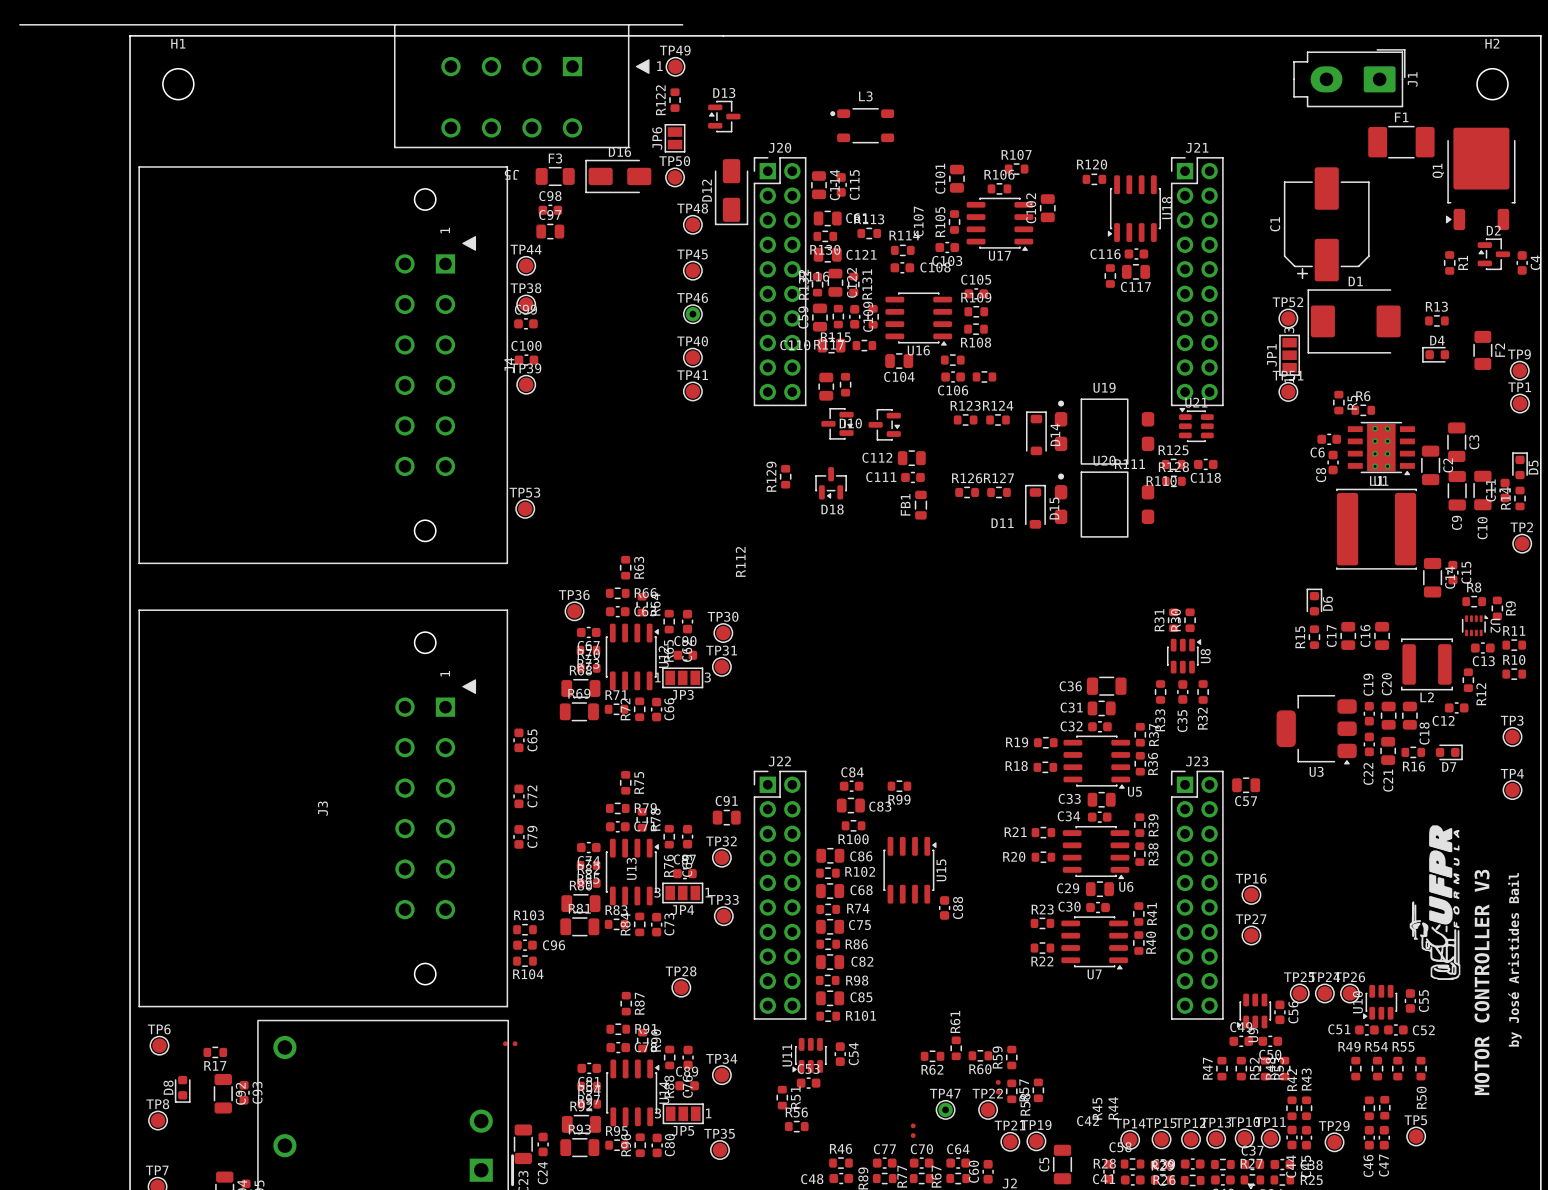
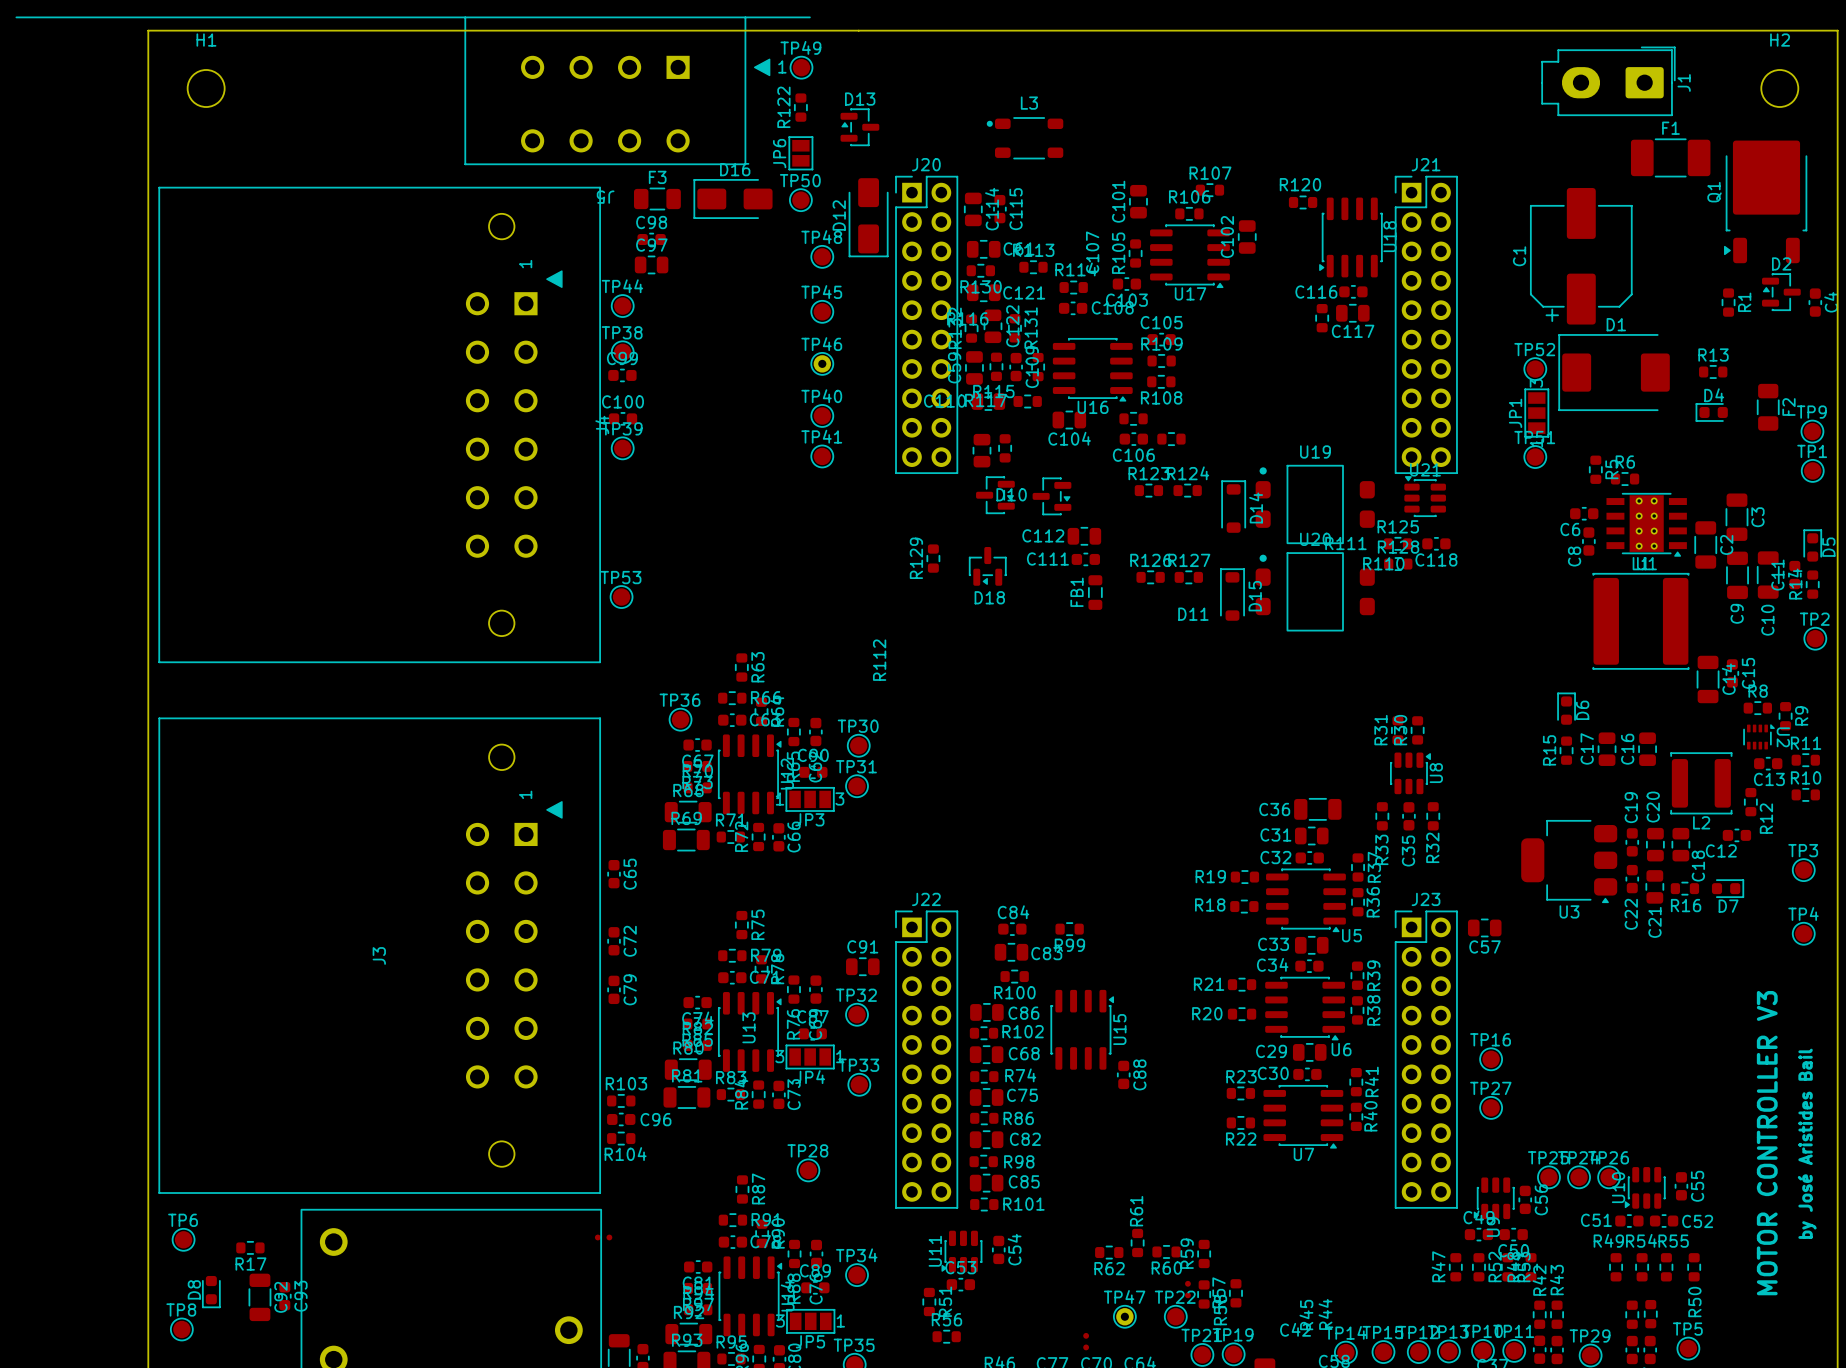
drawing: [1409, 825, 1461, 980] -> none

